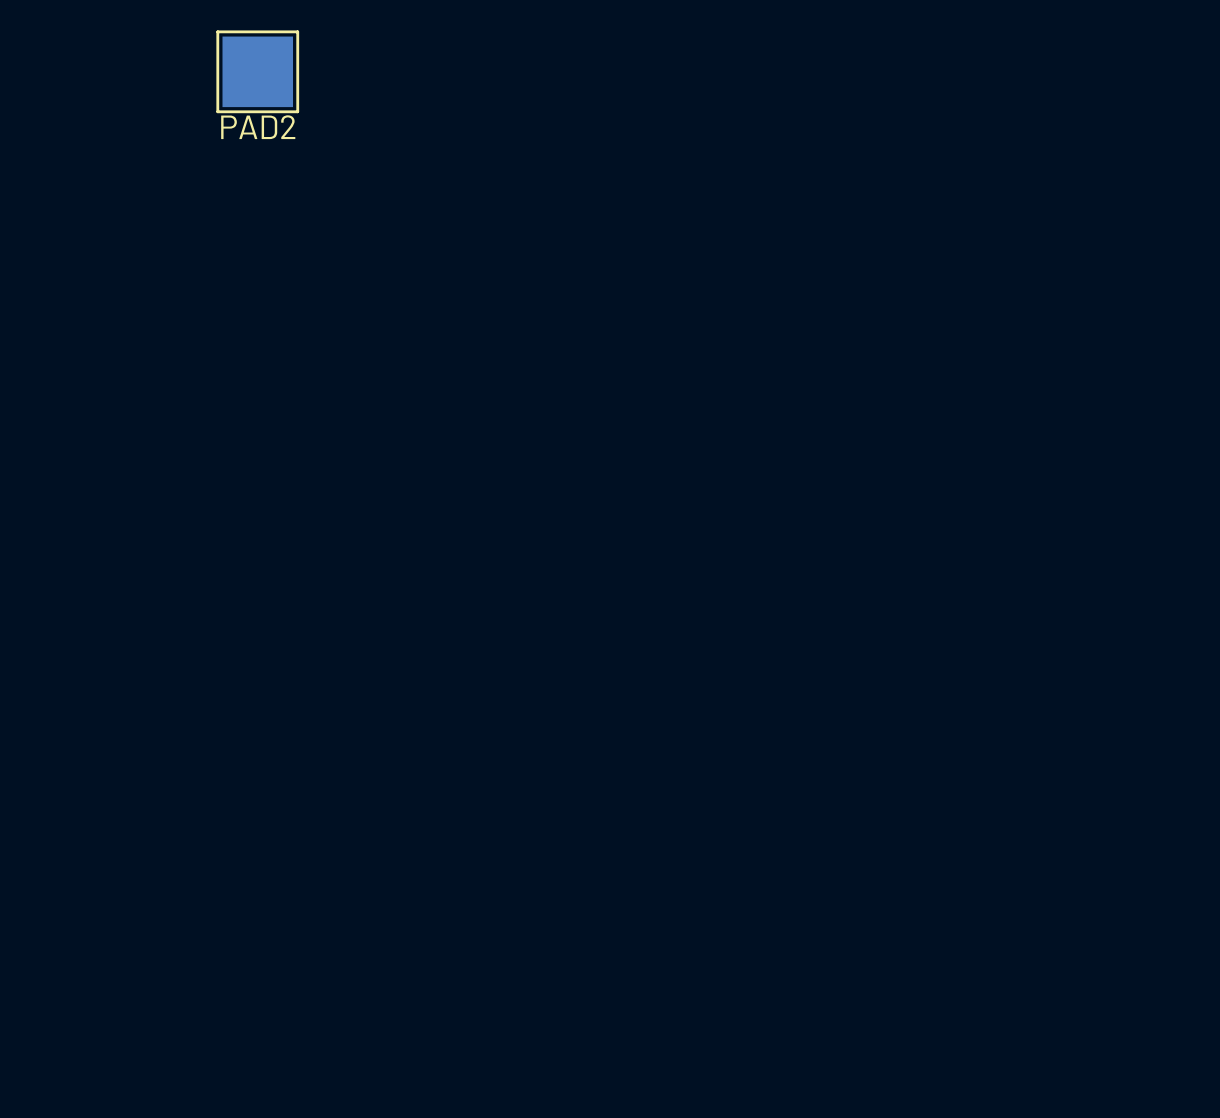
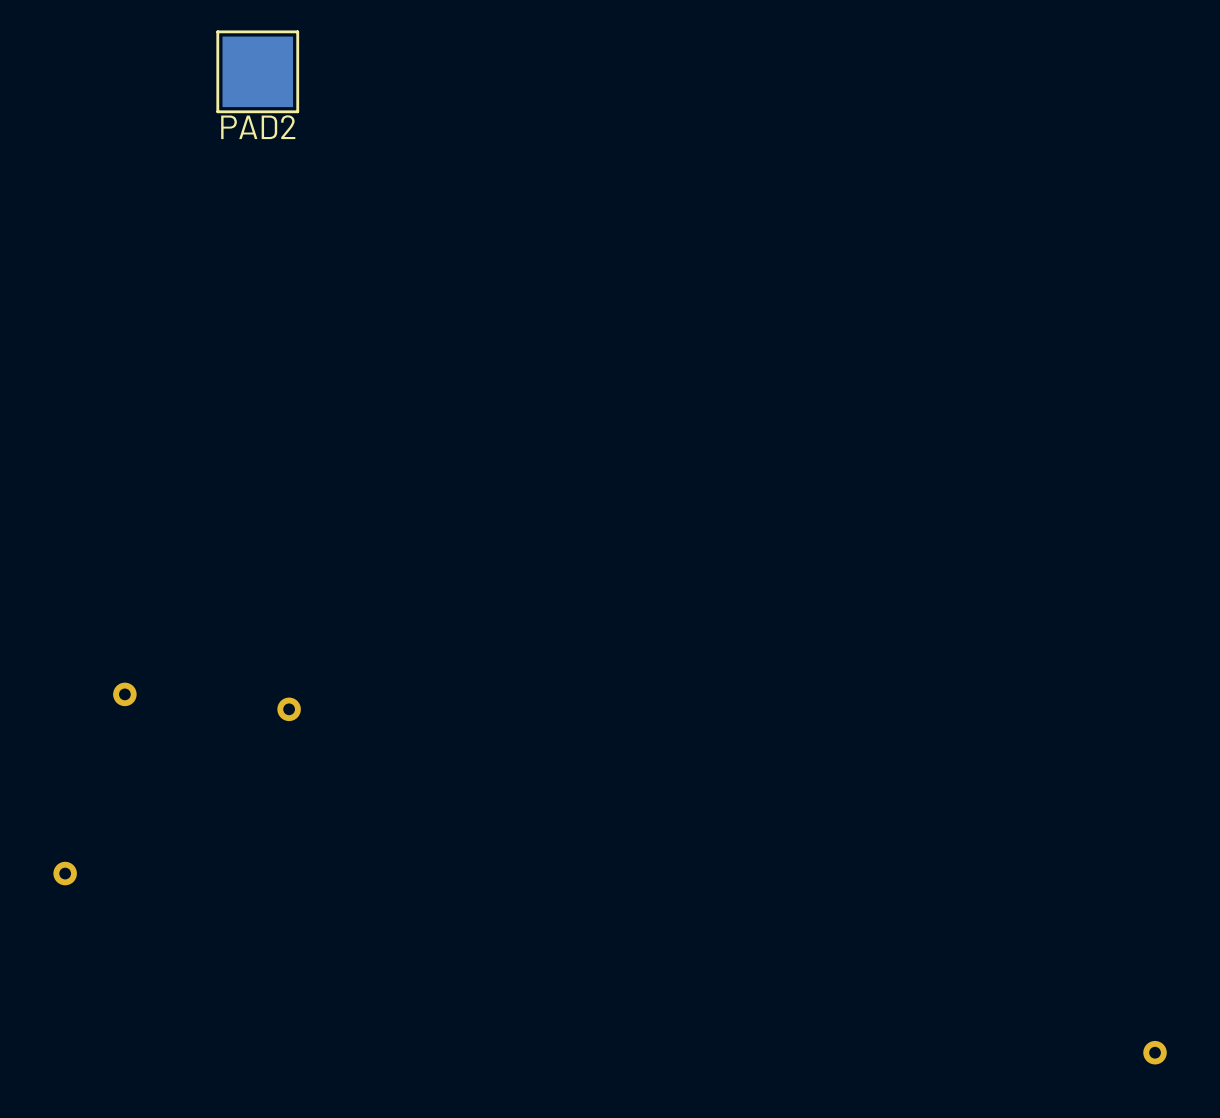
part: none -> (124, 694)
part: none -> (289, 709)
part: none -> (65, 873)
part: none -> (1155, 1052)

